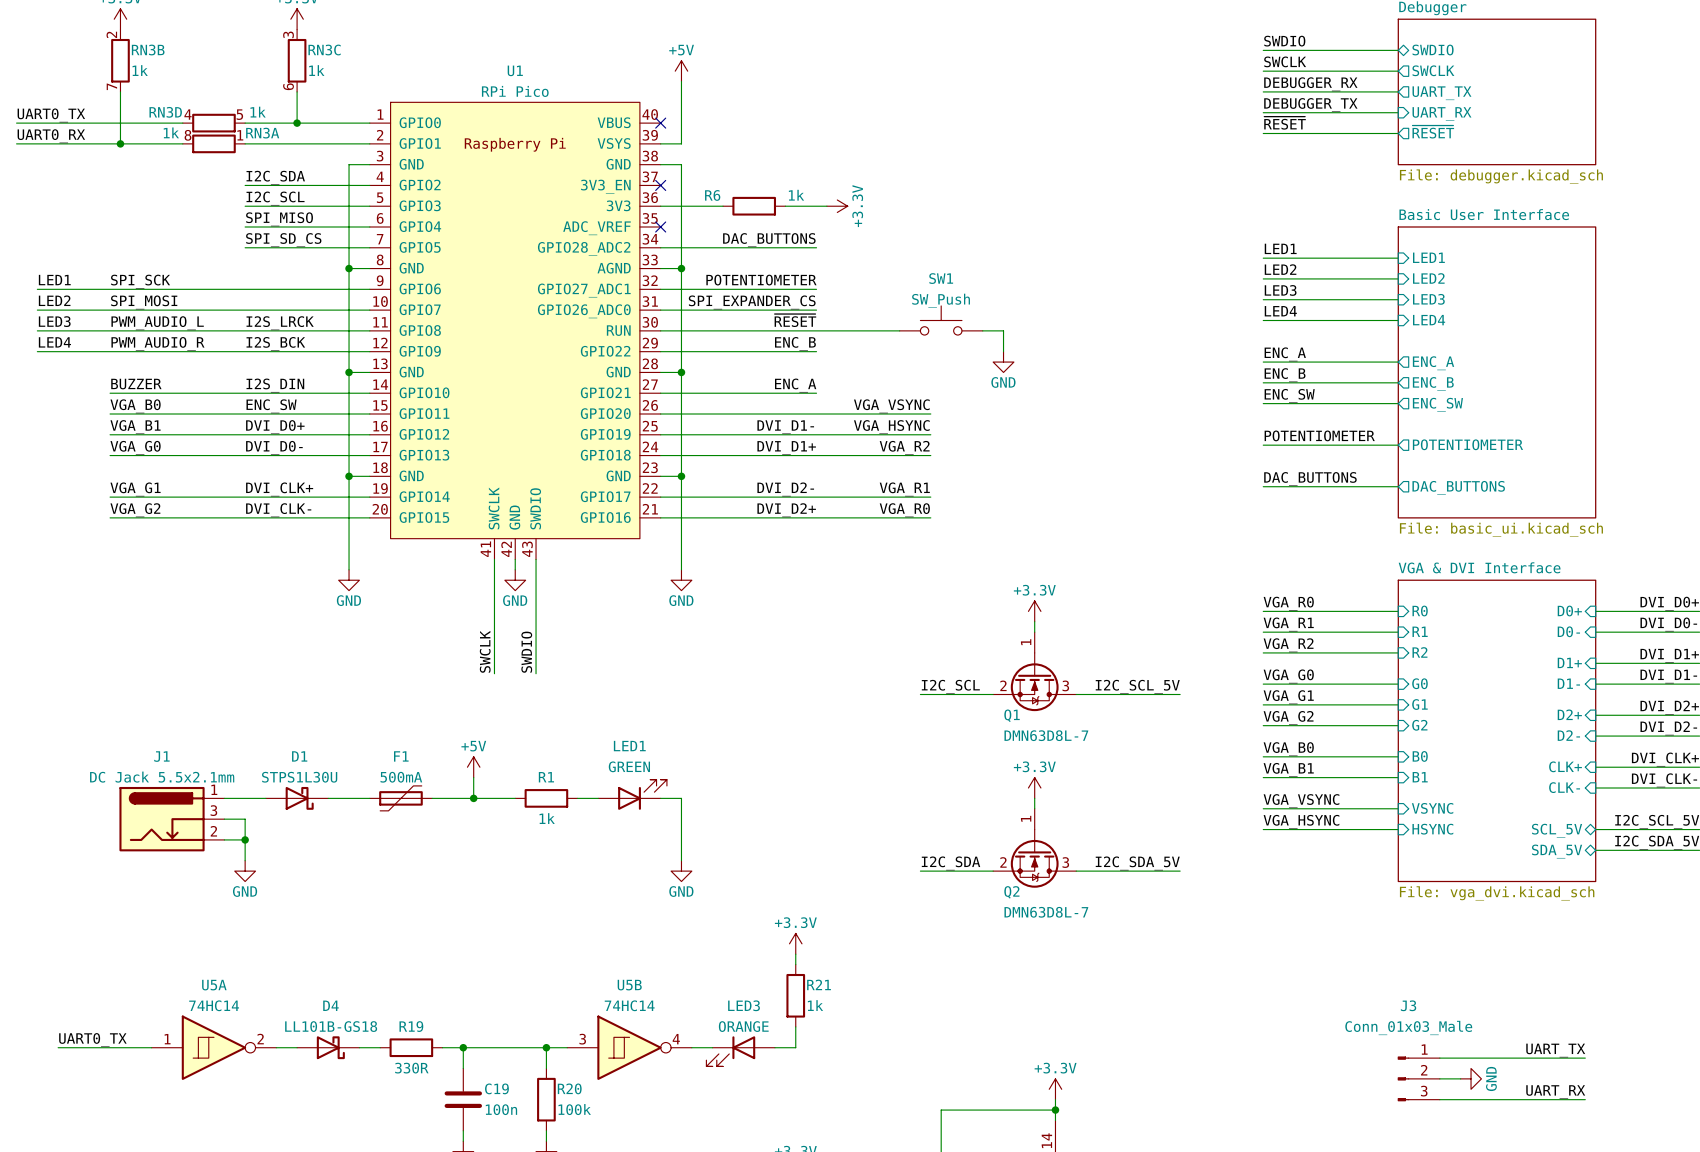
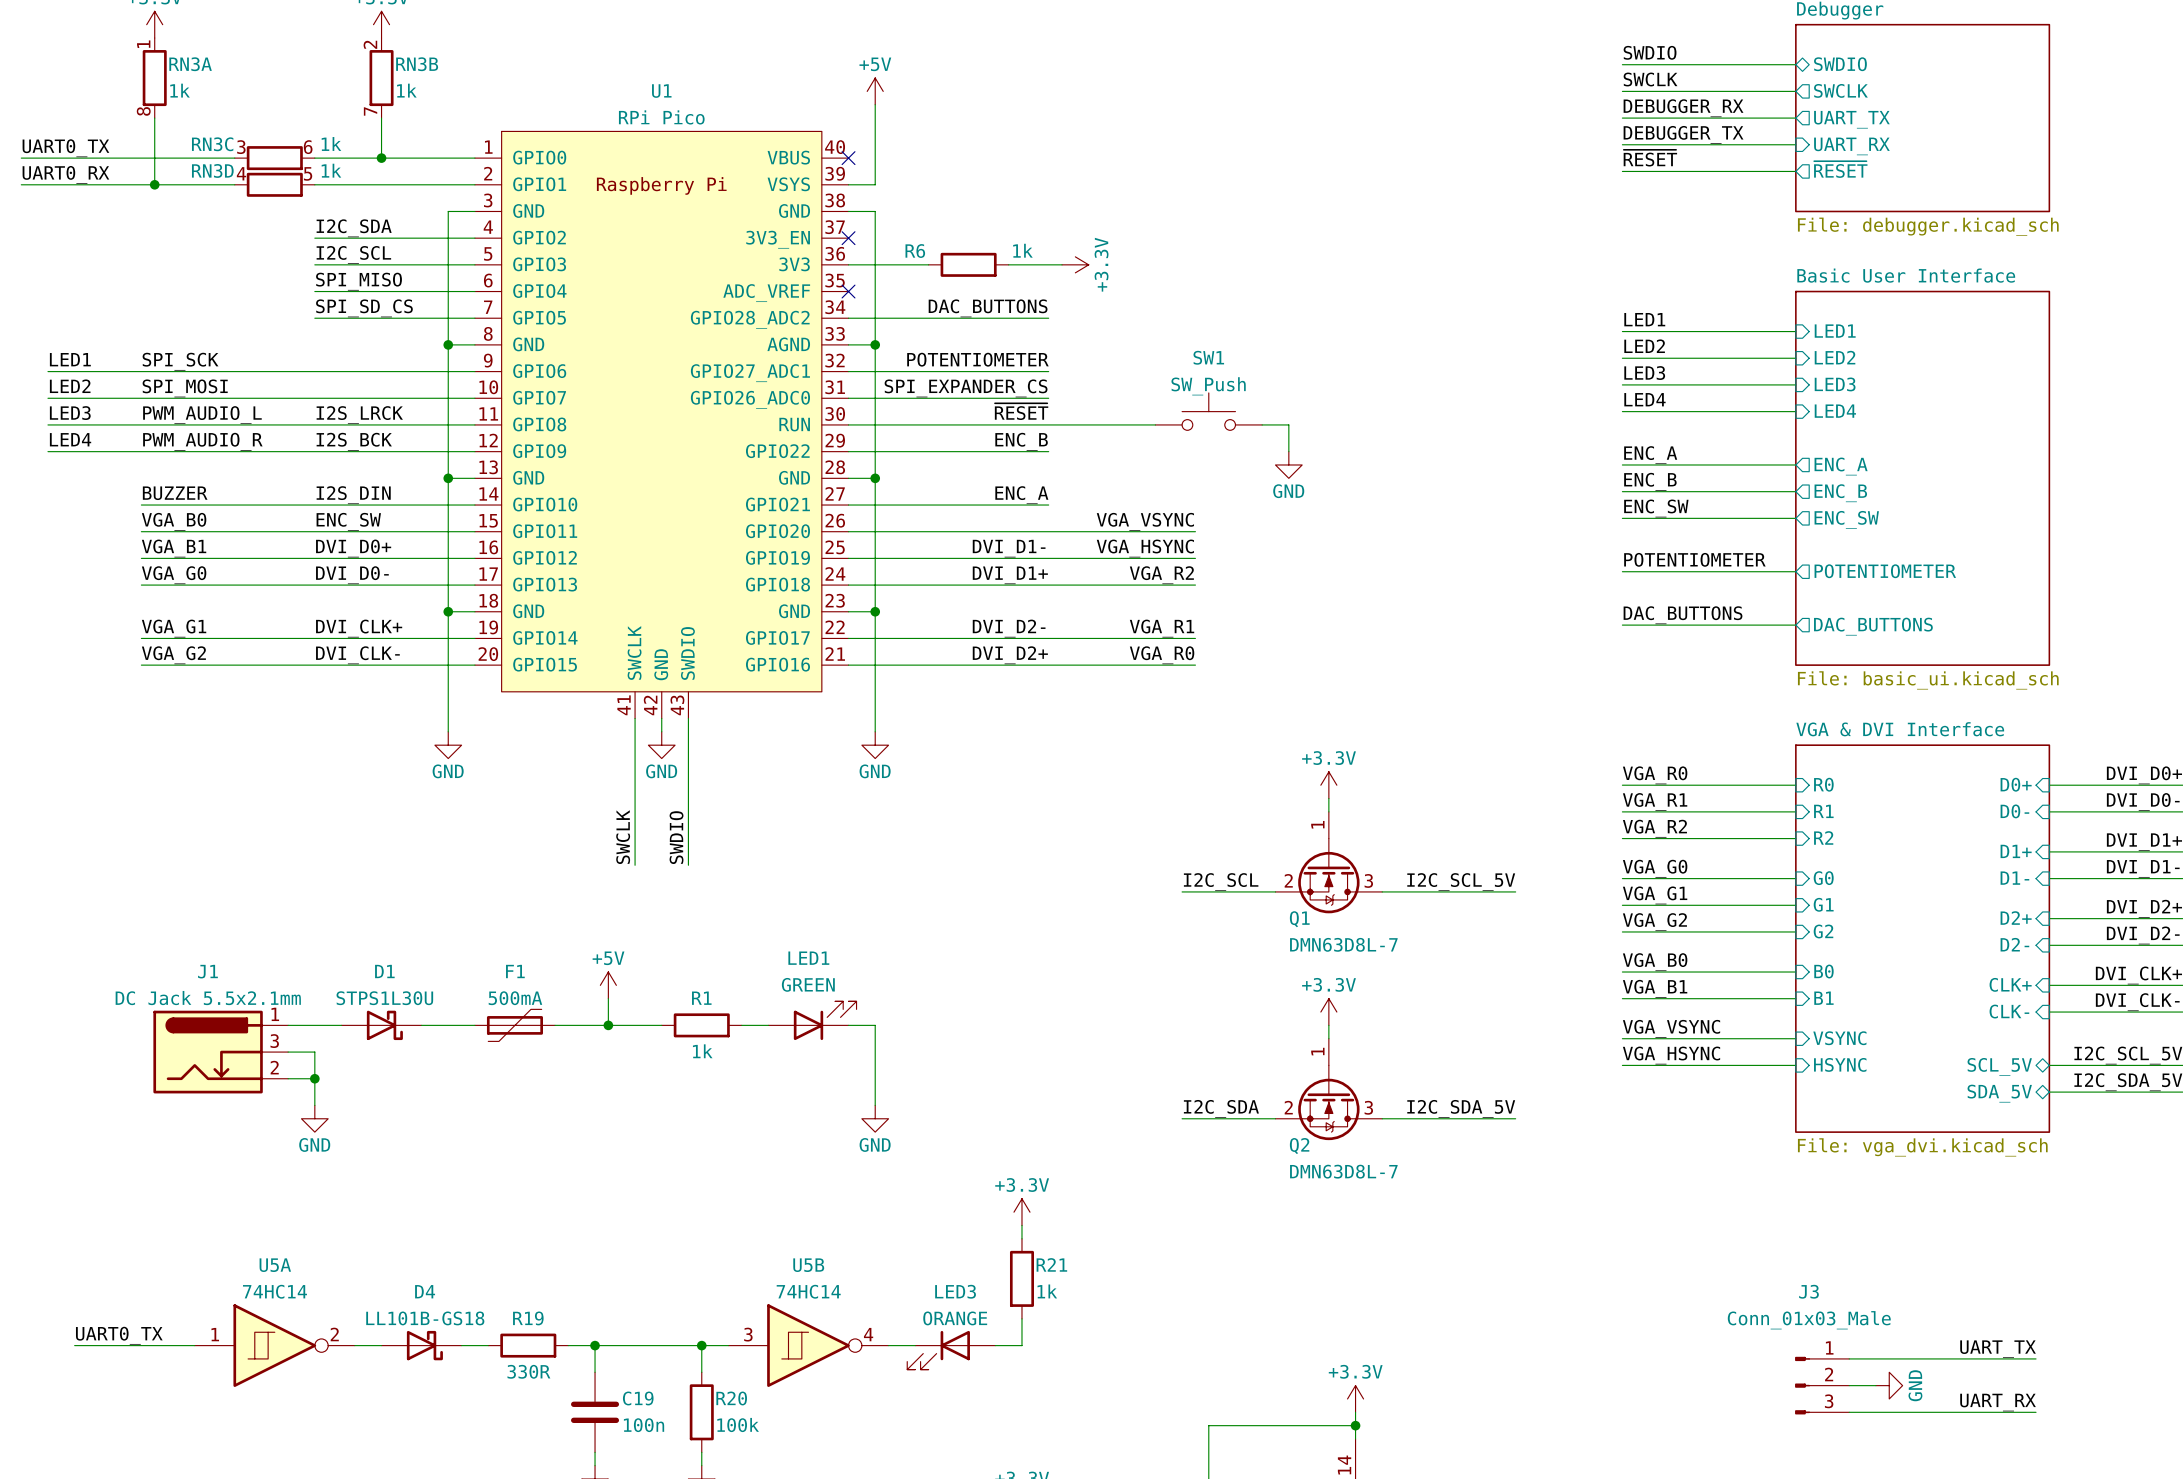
RN3C name position: RN3C (324, 50) -> RN3C (212, 144)
RN3B position: (120, 60) -> (381, 78)
RN3C rotation: 0° (297, 60) -> 90° counterclockwise (274, 158)
RN3C position: (297, 60) -> (274, 158)
RN3D position: (213, 123) -> (274, 184)
RN3A value position: 1k (171, 132) -> 1k (180, 90)
RN3A name position: RN3A (262, 133) -> RN3A (190, 64)
RN3A rotation: 0° (213, 143) -> 90° counterclockwise (154, 78)
RN3A position: (213, 143) -> (154, 78)

